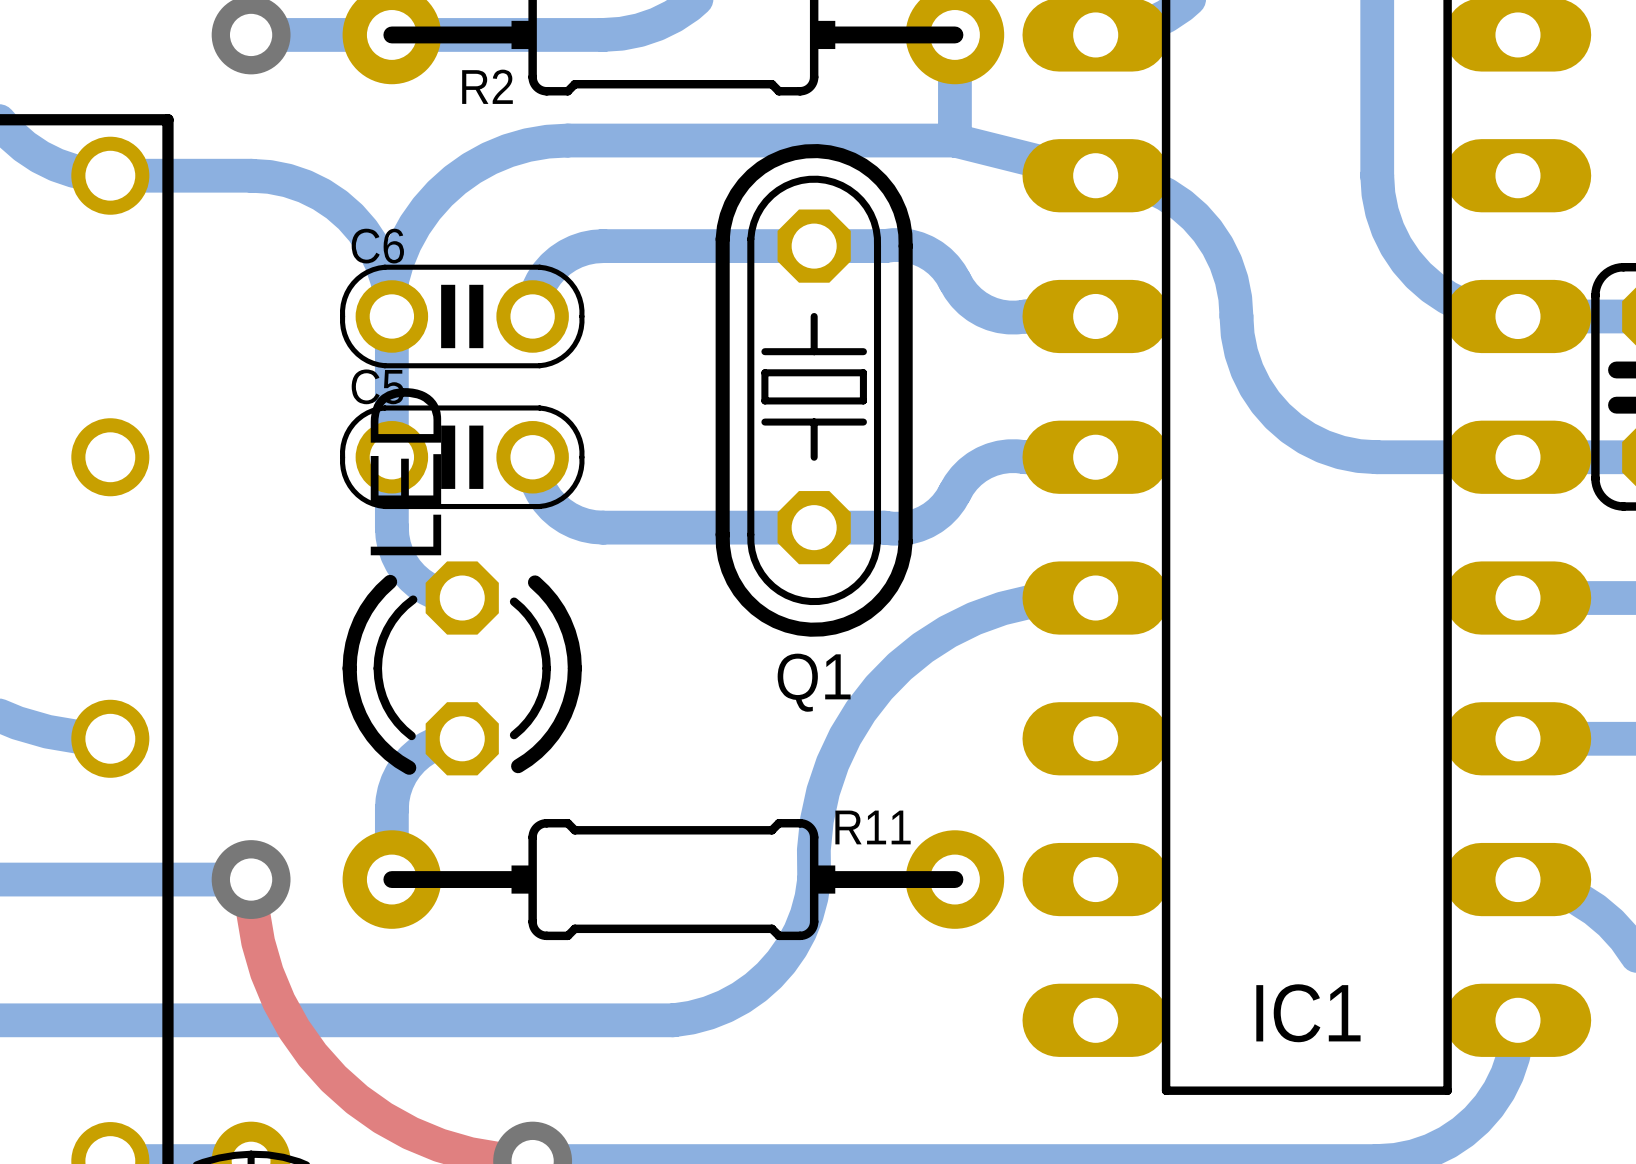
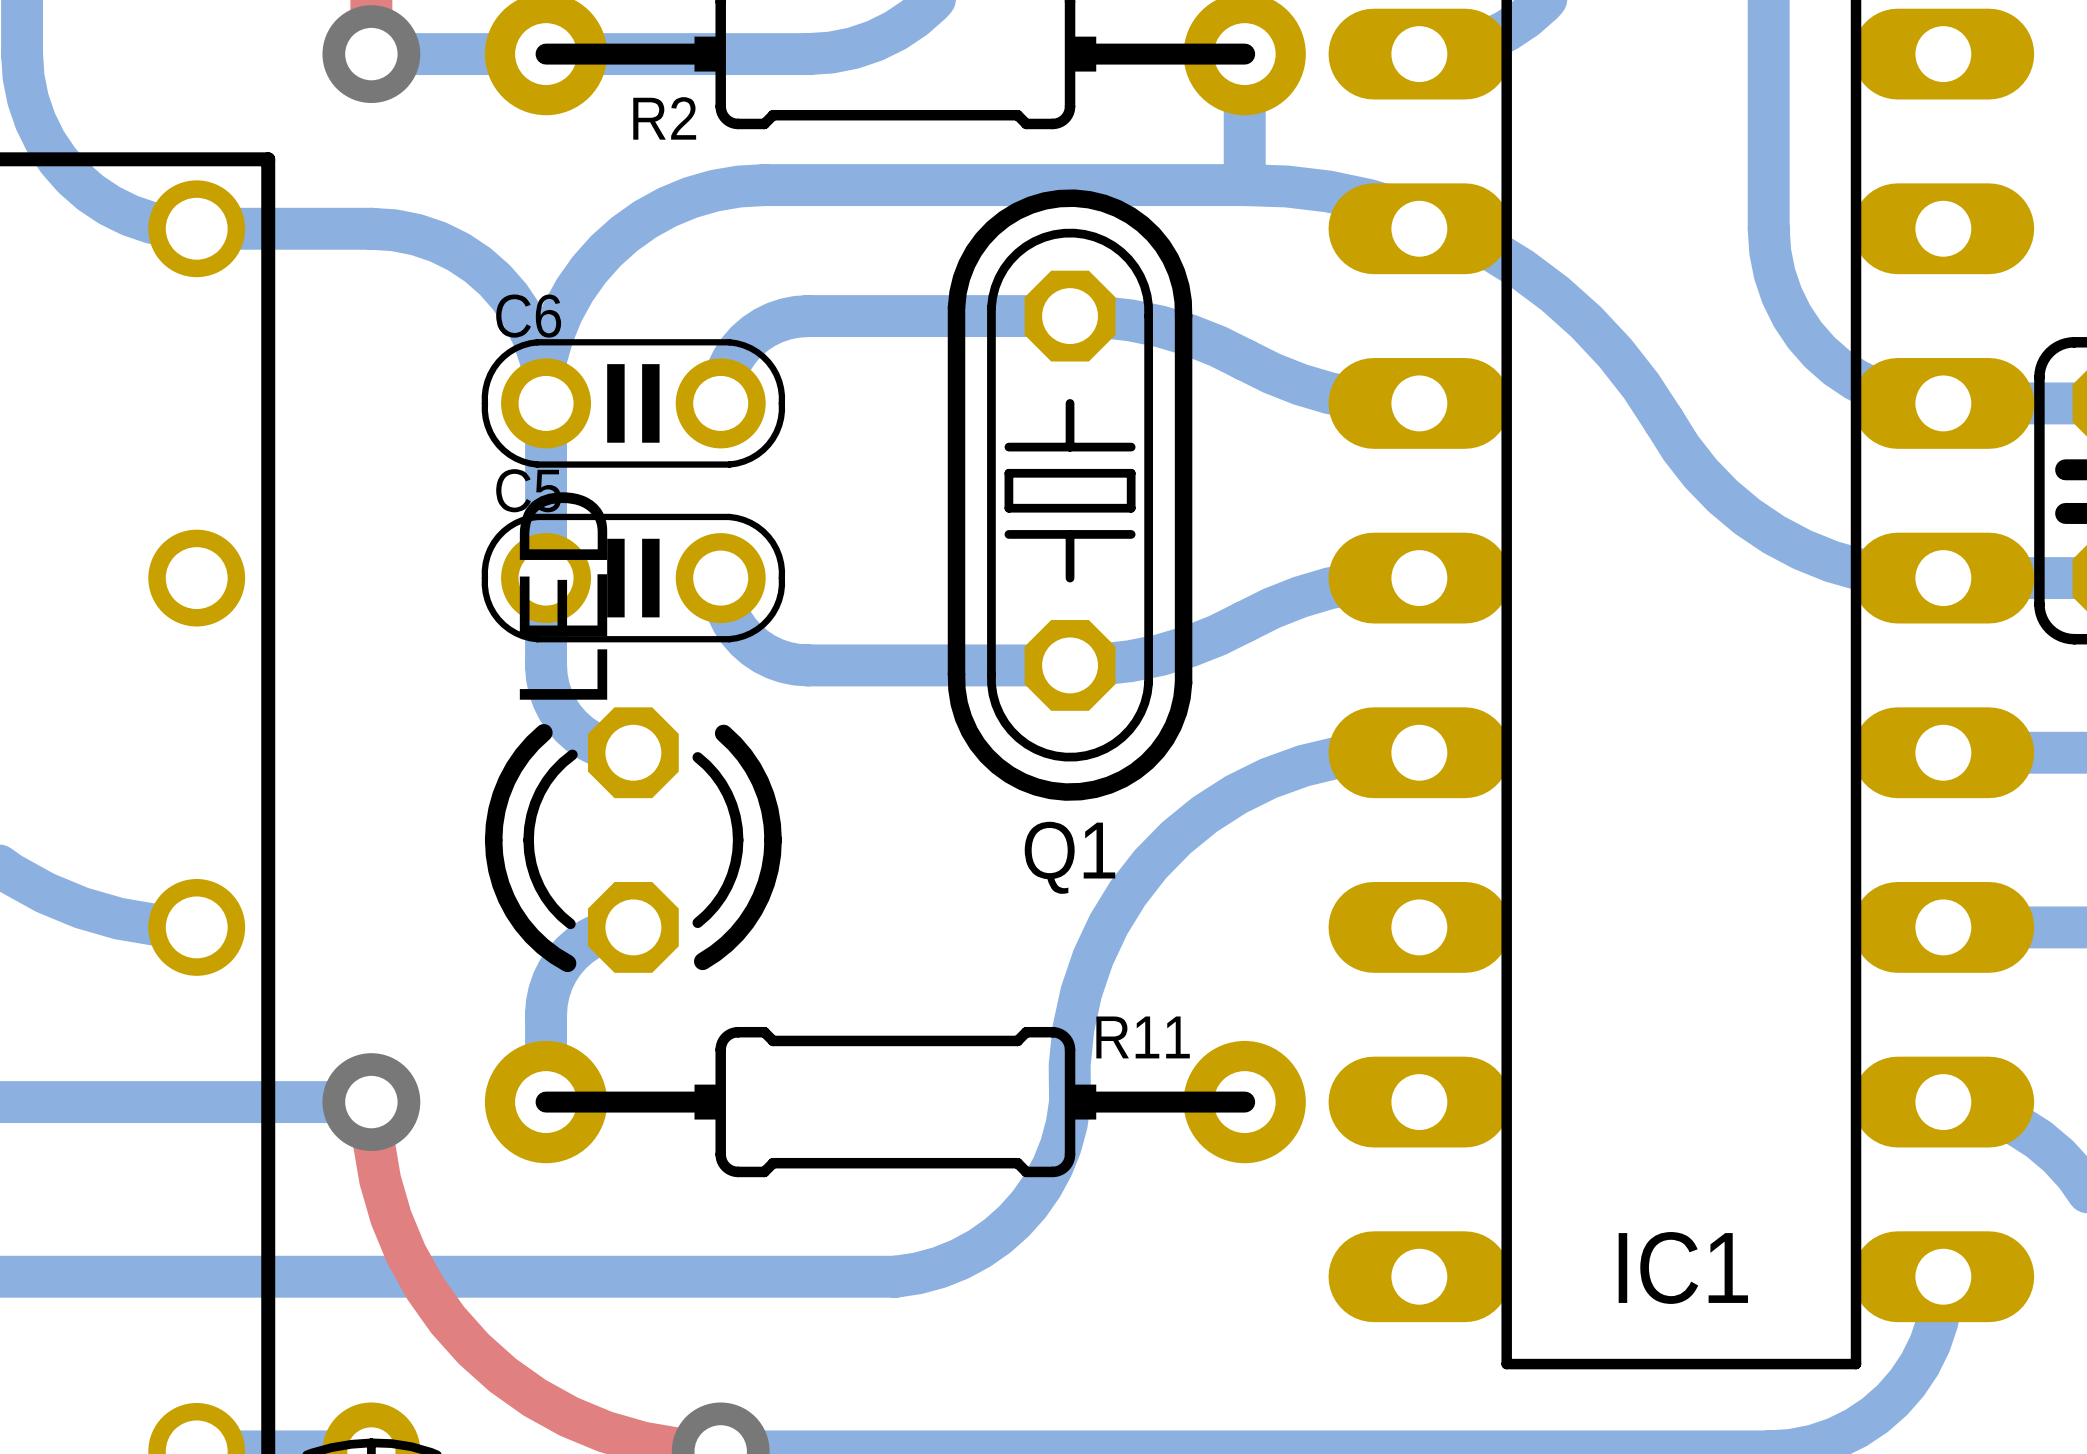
bottom track: (954, 140) (1095, 175) (1132, 180) (1166, 194) (1181, 204) (1207, 230) (1225, 262) (1235, 298) (1237, 334) (1241, 352) (1255, 386) (1277, 416) (1306, 438) (1340, 452) (1358, 456) (1503, 457) -> (1244, 185) (1286, 186) (1328, 191) (1369, 200) (1409, 212) (1448, 227) (1485, 246) (1521, 268) (1555, 294) (1586, 322) (1615, 352) (1640, 385) (1680, 448) (1700, 473) (1722, 496) (1747, 516) (1773, 534) (1802, 549) (1831, 561) (1862, 570) (1893, 575) (1925, 578)
bottom track: (814, 246) (909, 246) (925, 251) (939, 261) (950, 273) (964, 295) (976, 306) (991, 314) (1008, 317) (1095, 316) -> (1070, 316) (1100, 316) (1160, 326) (1217, 346) (1271, 373) (1300, 384) (1358, 399) (1419, 403)
bottom track: (1095, 457) (1008, 456) (991, 459) (976, 467) (964, 478) (950, 499) (939, 512) (925, 521) (909, 527) (814, 527) -> (1419, 578) (1389, 578) (1329, 588) (1271, 608) (1217, 635) (1189, 646) (1130, 661) (1070, 665)

